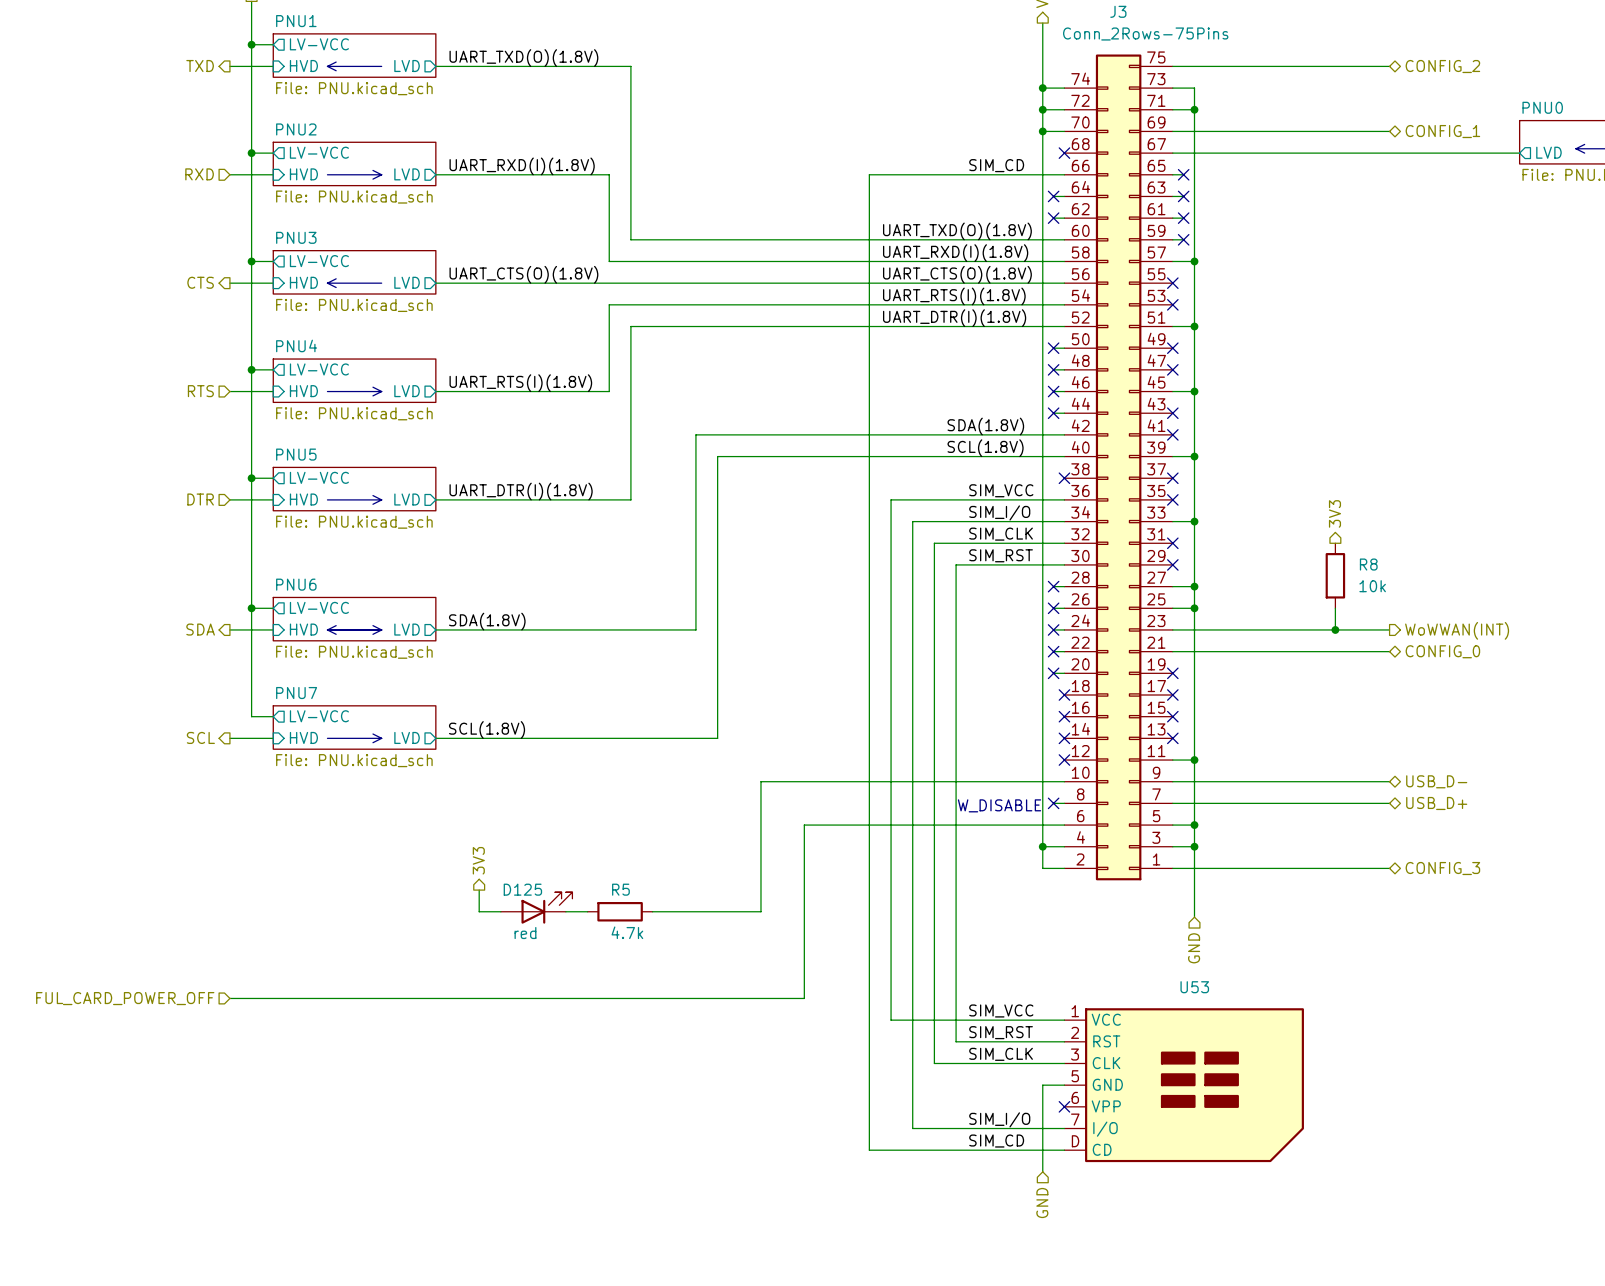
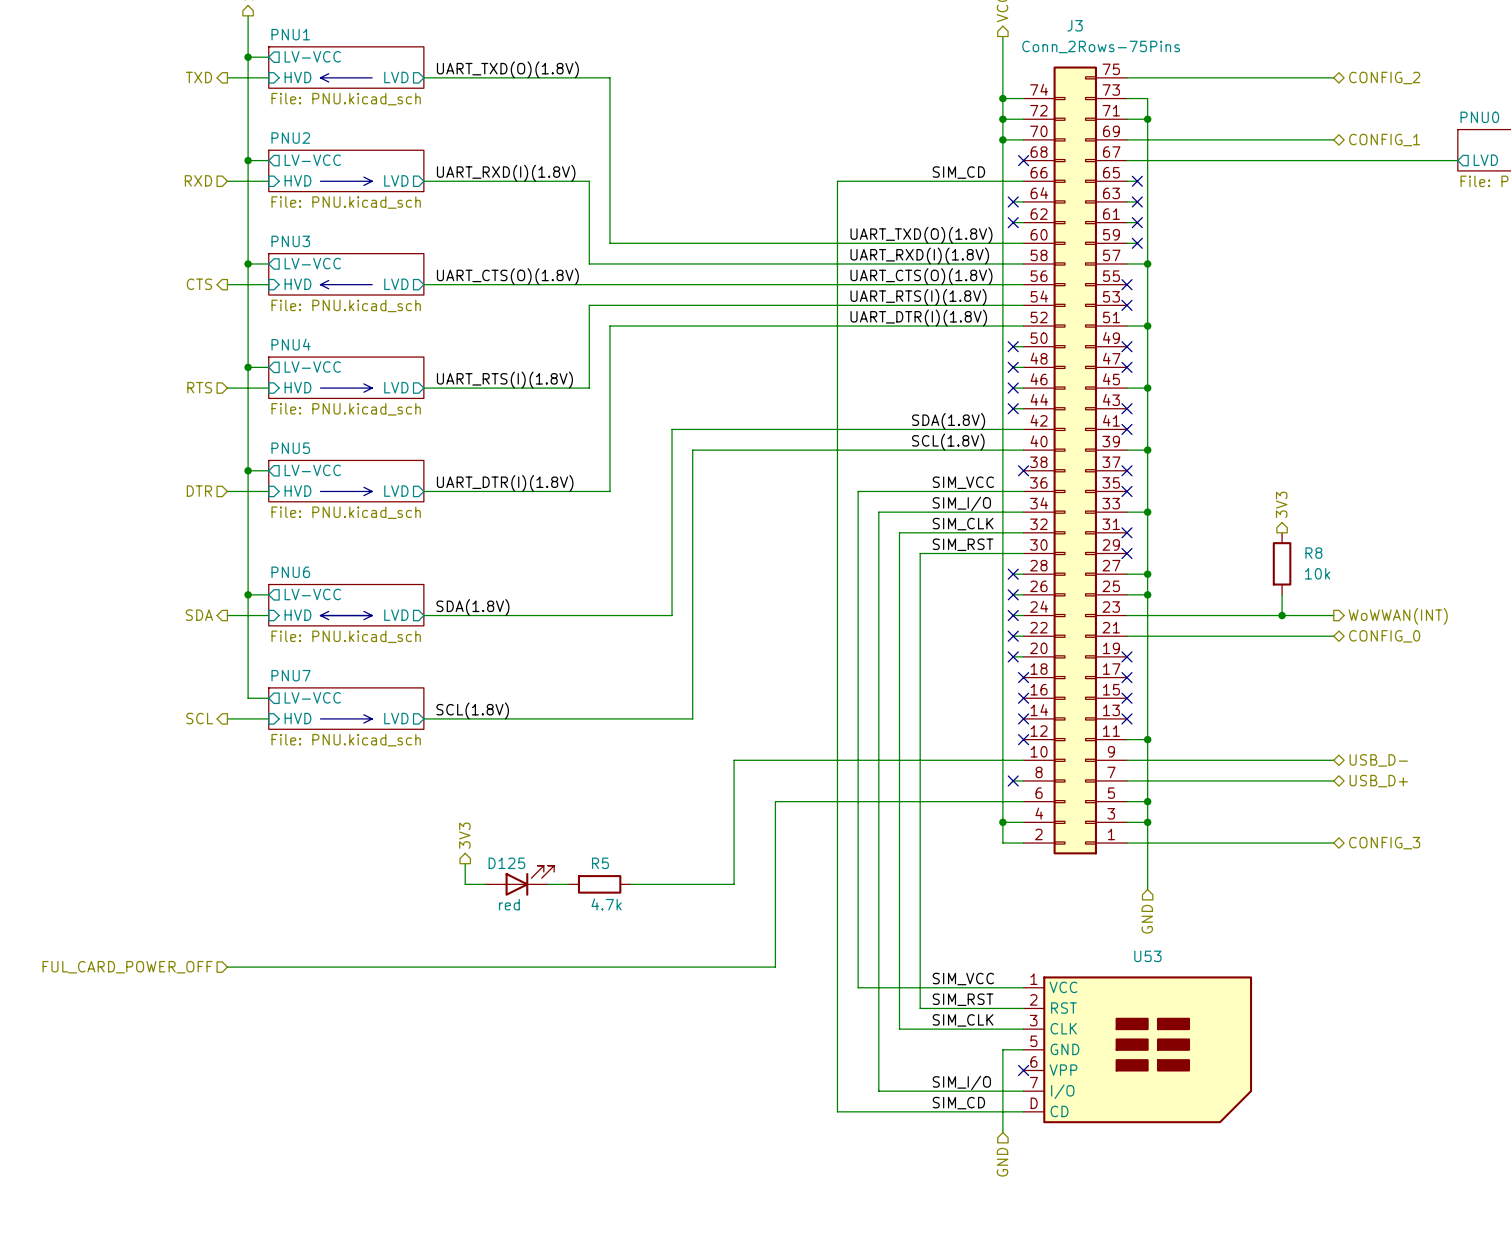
text: W_DISABLE (999, 805) -> none

